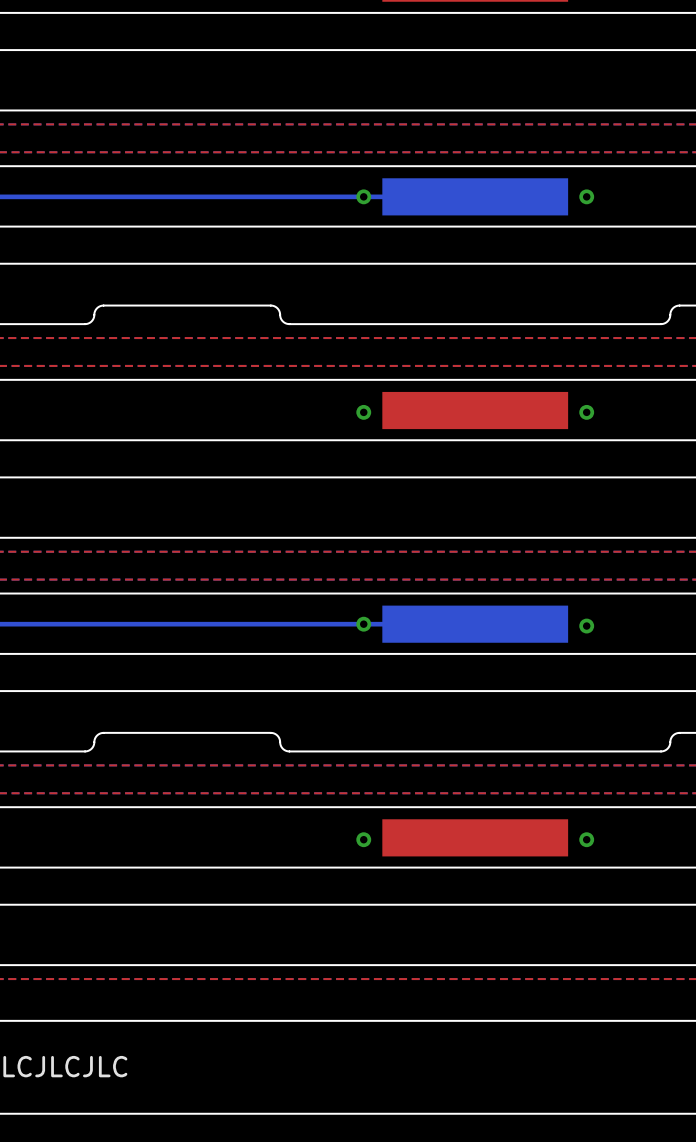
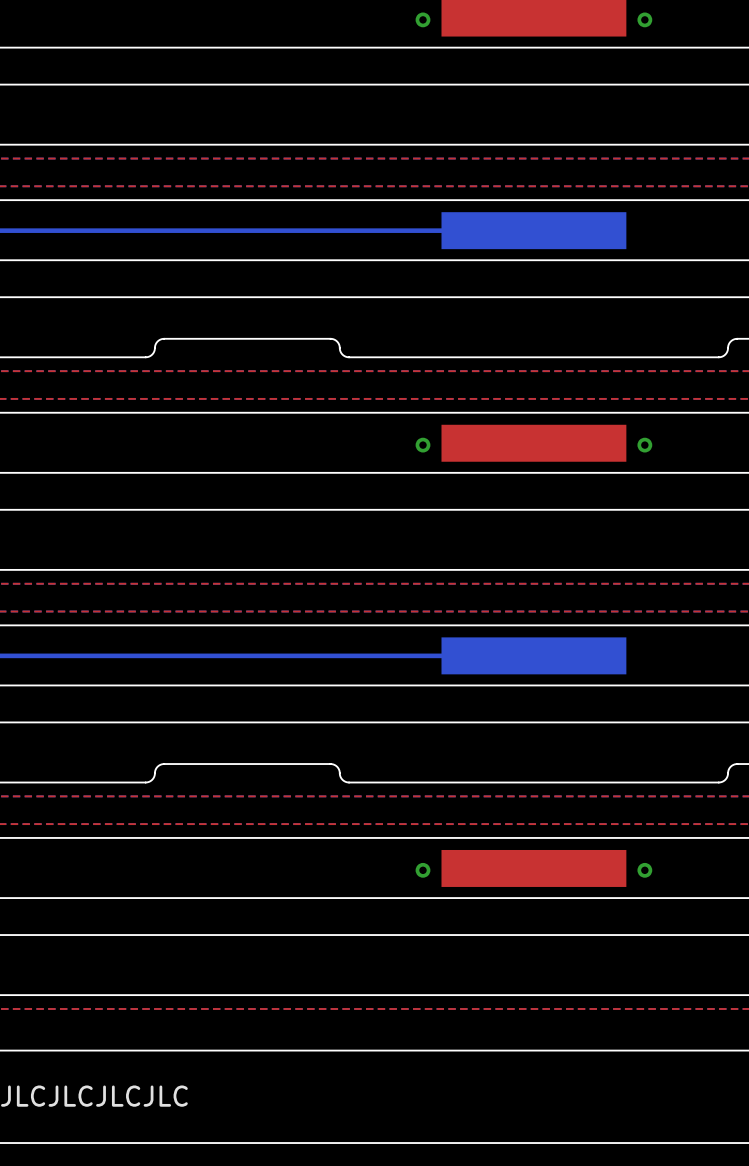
via: (363, 196) -> none
via: (586, 196) -> none
via: (363, 624) -> none
via: (586, 626) -> none

